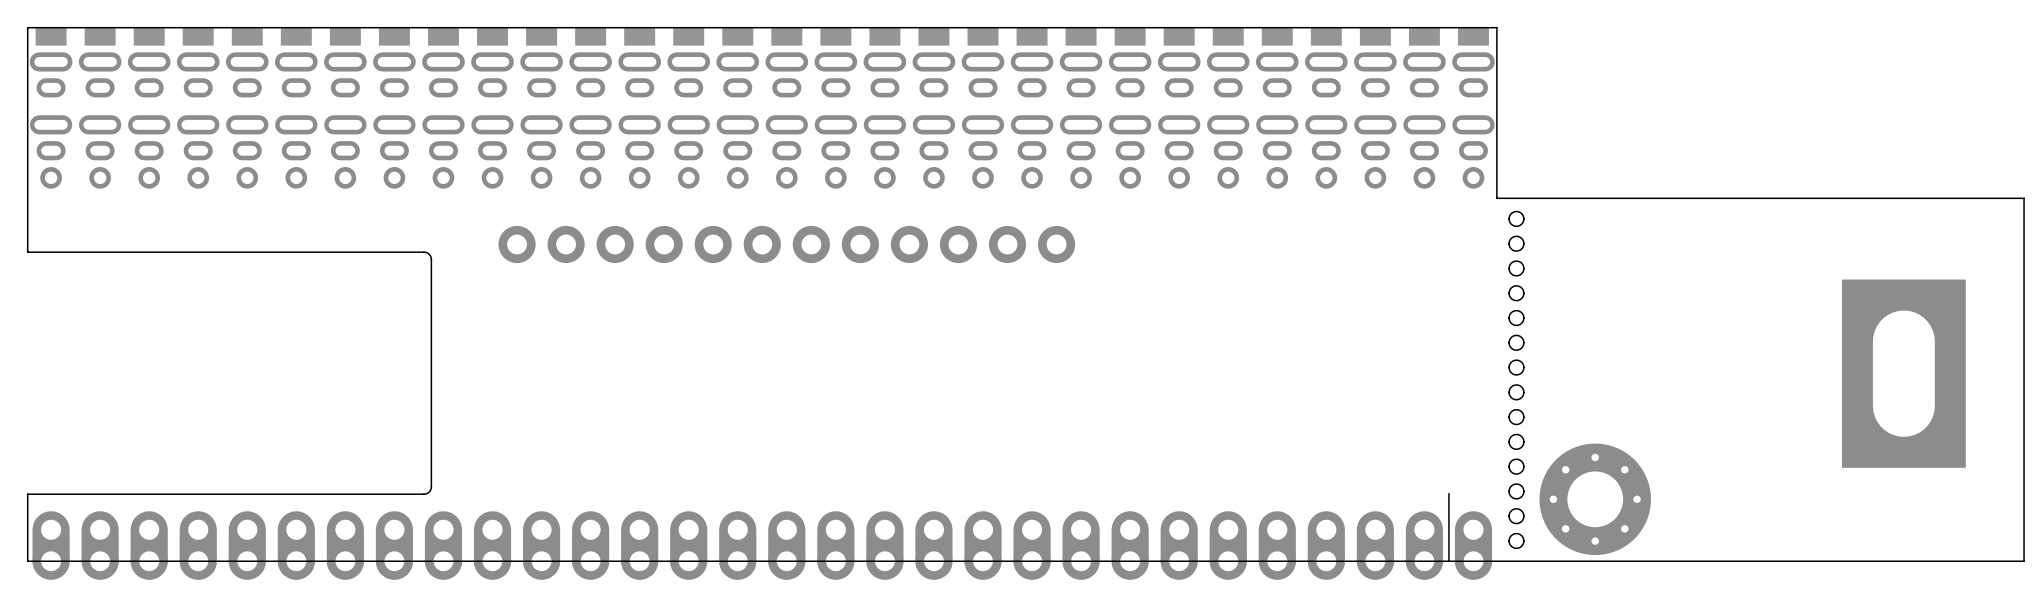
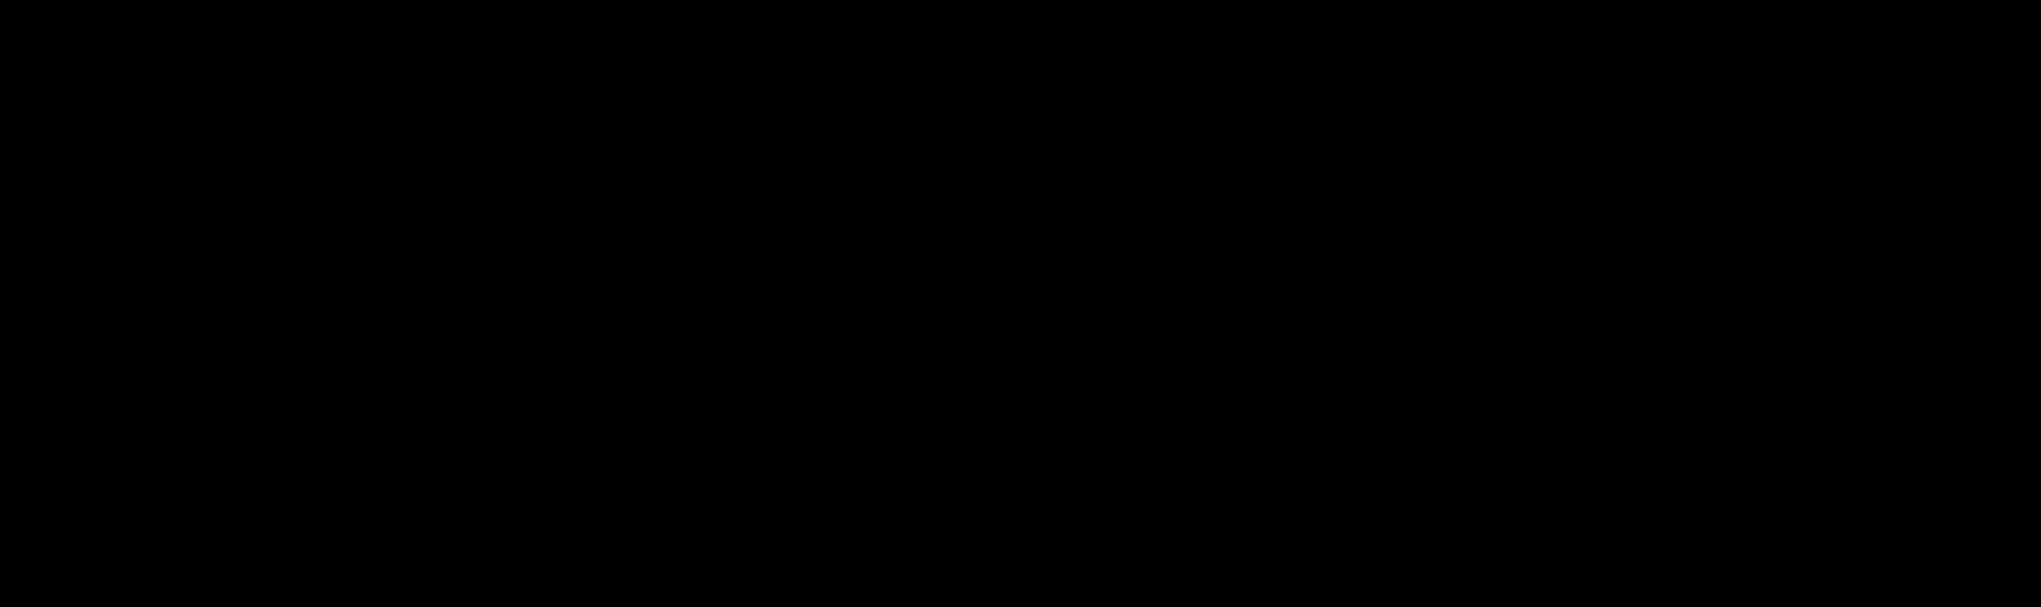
board edge: (1496, 27) (1496, 198) (2024, 198) (2024, 561) (27, 561) (27, 494) (424, 494) (429, 492) (431, 486) (431, 259) (429, 254) (424, 252) (27, 252) (27, 27) (1496, 27) -> none
part: (762, 108) -> none
board edge: (1523, 218) (1521, 224) (1516, 226) (1511, 224) (1509, 218) (1511, 213) (1516, 211) (1521, 213) (1523, 218) -> none
board edge: (1523, 243) (1521, 248) (1516, 251) (1511, 248) (1509, 243) (1511, 238) (1516, 236) (1521, 238) (1523, 243) -> none
part: (786, 244) -> none
board edge: (1523, 268) (1521, 273) (1516, 275) (1511, 273) (1509, 268) (1511, 263) (1516, 261) (1521, 263) (1523, 268) -> none
board edge: (1523, 293) (1521, 298) (1516, 300) (1511, 298) (1509, 293) (1511, 288) (1516, 285) (1521, 288) (1523, 293) -> none
board edge: (1523, 318) (1521, 323) (1516, 325) (1511, 323) (1509, 318) (1511, 312) (1516, 310) (1521, 312) (1523, 318) -> none
board edge: (1523, 342) (1521, 348) (1516, 350) (1511, 348) (1509, 342) (1511, 337) (1516, 335) (1521, 337) (1523, 342) -> none
board edge: (1523, 367) (1521, 372) (1516, 374) (1511, 372) (1509, 367) (1511, 362) (1516, 360) (1521, 362) (1523, 367) -> none
part: (1903, 373) -> none
board edge: (1523, 392) (1521, 397) (1516, 399) (1511, 397) (1509, 392) (1511, 387) (1516, 384) (1521, 387) (1523, 392) -> none
board edge: (1523, 417) (1521, 422) (1516, 424) (1511, 422) (1509, 417) (1511, 411) (1516, 409) (1521, 411) (1523, 417) -> none
board edge: (1523, 441) (1521, 447) (1516, 449) (1511, 447) (1509, 441) (1511, 436) (1516, 434) (1521, 436) (1523, 441) -> none
board edge: (1523, 466) (1521, 471) (1516, 474) (1511, 471) (1509, 466) (1511, 461) (1516, 459) (1521, 461) (1523, 466) -> none
board edge: (1523, 491) (1521, 496) (1516, 498) (1511, 496) (1509, 491) (1511, 486) (1516, 484) (1521, 486) (1523, 491) -> none
part: (1595, 499) -> none
board edge: (1523, 516) (1521, 521) (1516, 523) (1511, 521) (1509, 516) (1511, 510) (1516, 508) (1521, 510) (1523, 516) -> none
part: (762, 536) -> none
board edge: (1523, 540) (1521, 535) (1516, 533) (1511, 535) (1509, 540) (1511, 546) (1516, 548) (1521, 546) (1523, 540) -> none

